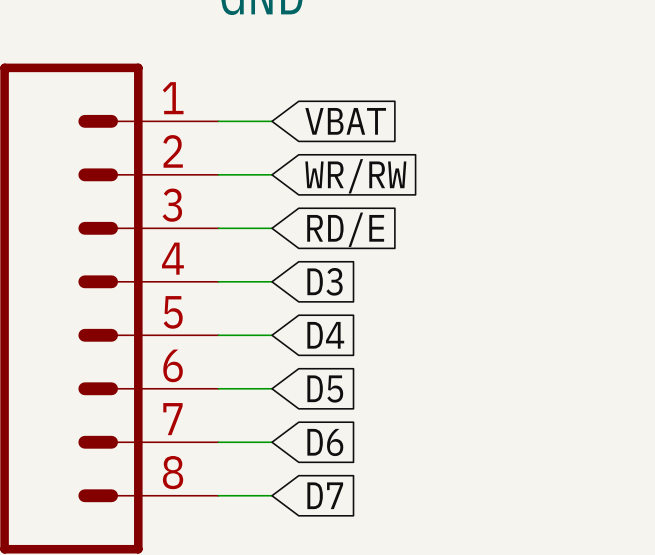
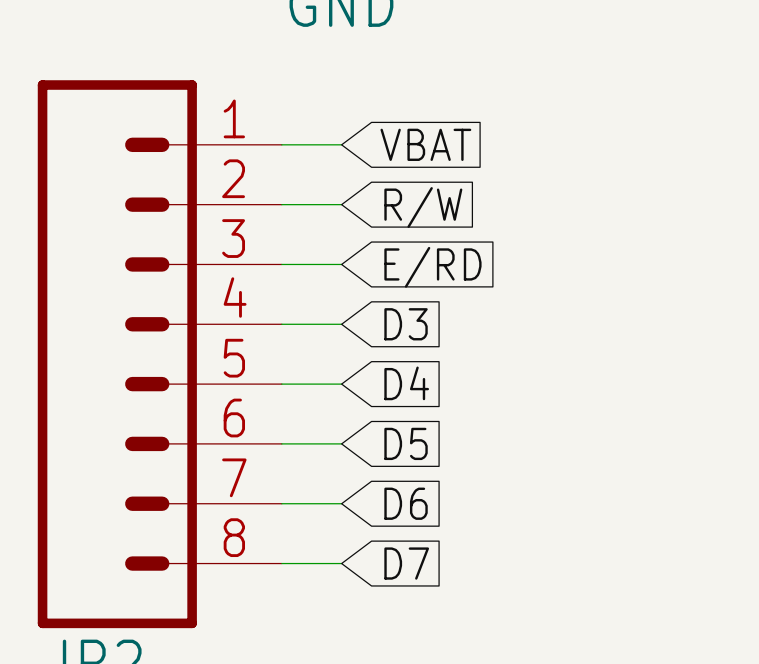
global label: WR/RW (355, 176) -> R/W (423, 207)
global label: RD/E (345, 229) -> E/RD (432, 267)

